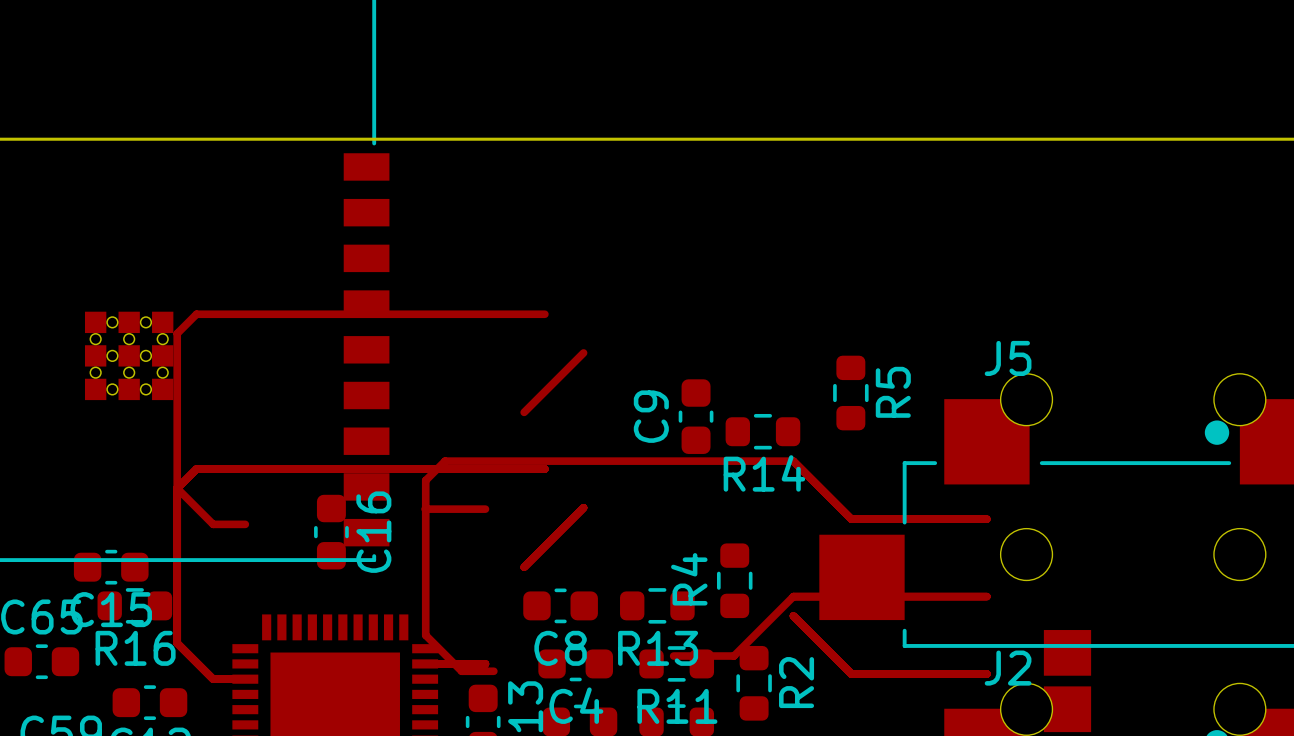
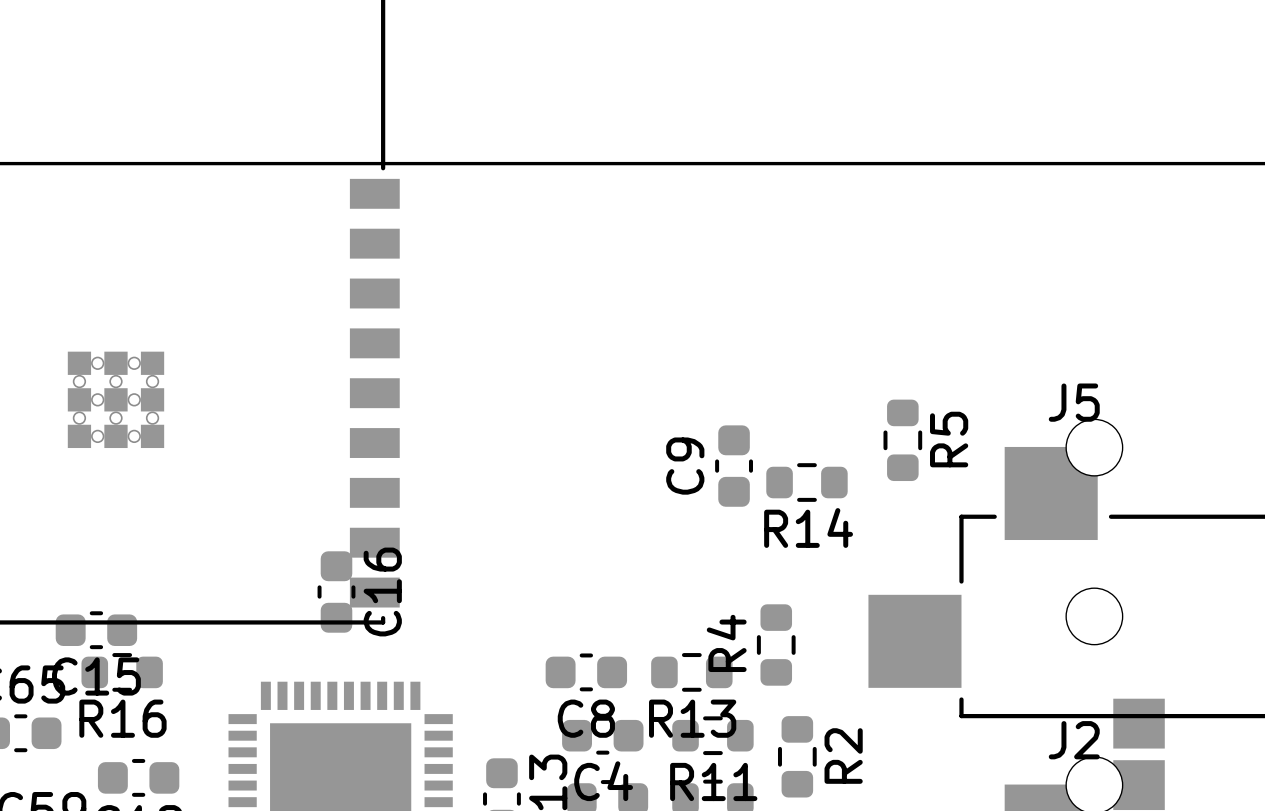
track: (544, 314) (196, 314) (177, 333) (177, 643) (213, 679) (245, 679) -> none
track: (583, 352) (524, 412) -> none
track: (544, 469) (196, 469) (177, 488) (213, 524) (245, 524) -> none
track: (583, 507) (524, 567) -> none
track: (425, 509) (485, 509) -> none
track: (986, 519) (851, 519) (793, 461) (445, 461) (425, 480) (425, 635) (461, 671) (493, 671) -> none
track: (986, 596) (793, 596) (733, 656) (673, 656) -> none
track: (793, 615) (851, 674) (986, 674) -> none
track: (425, 663) (485, 663) -> none

